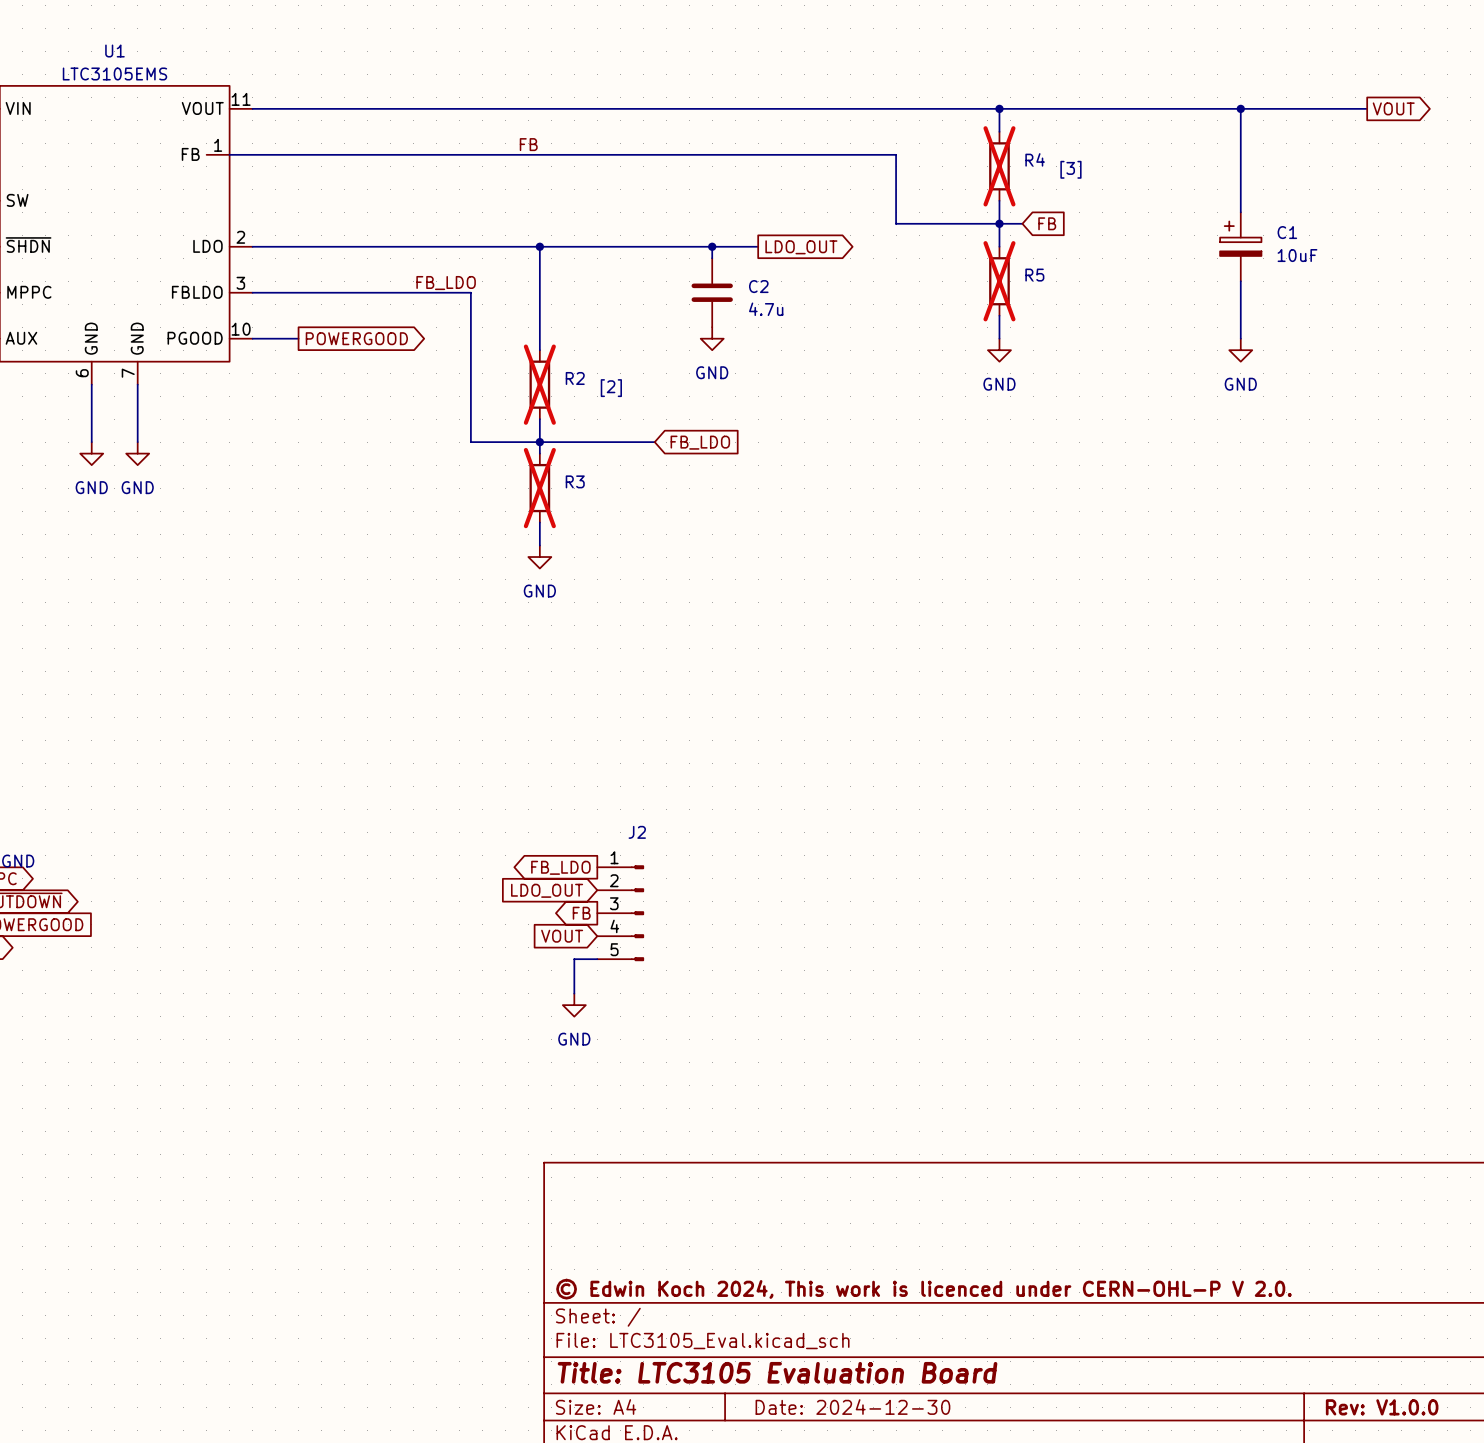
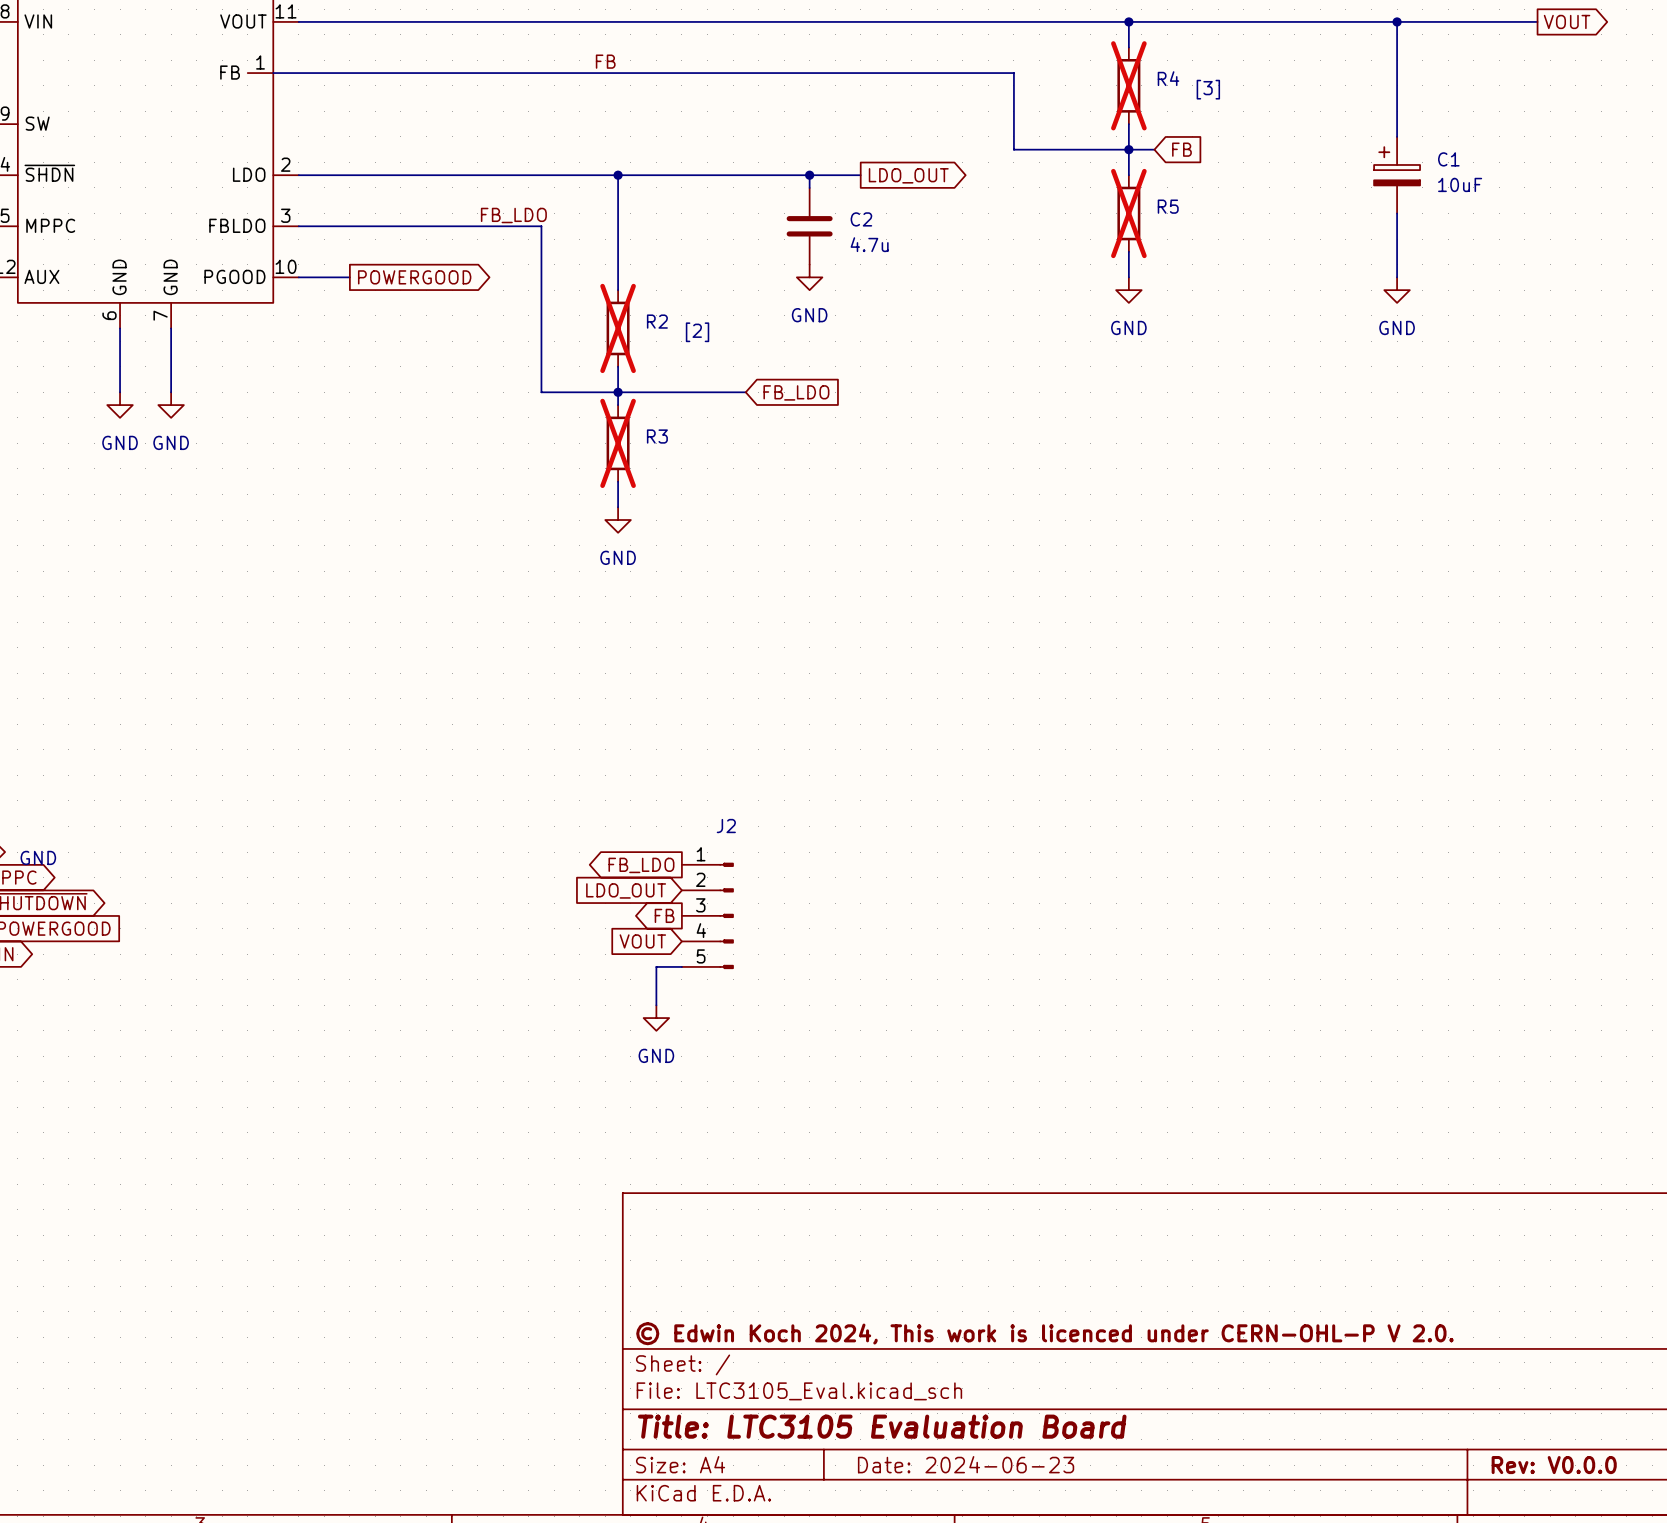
title block: Date: 2024-12-30 (852, 1407) -> Date: 2024-06-23 (966, 1464)
title block: Rev: V1.0.0 (1382, 1407) -> Rev: V0.0.0 (1554, 1465)

